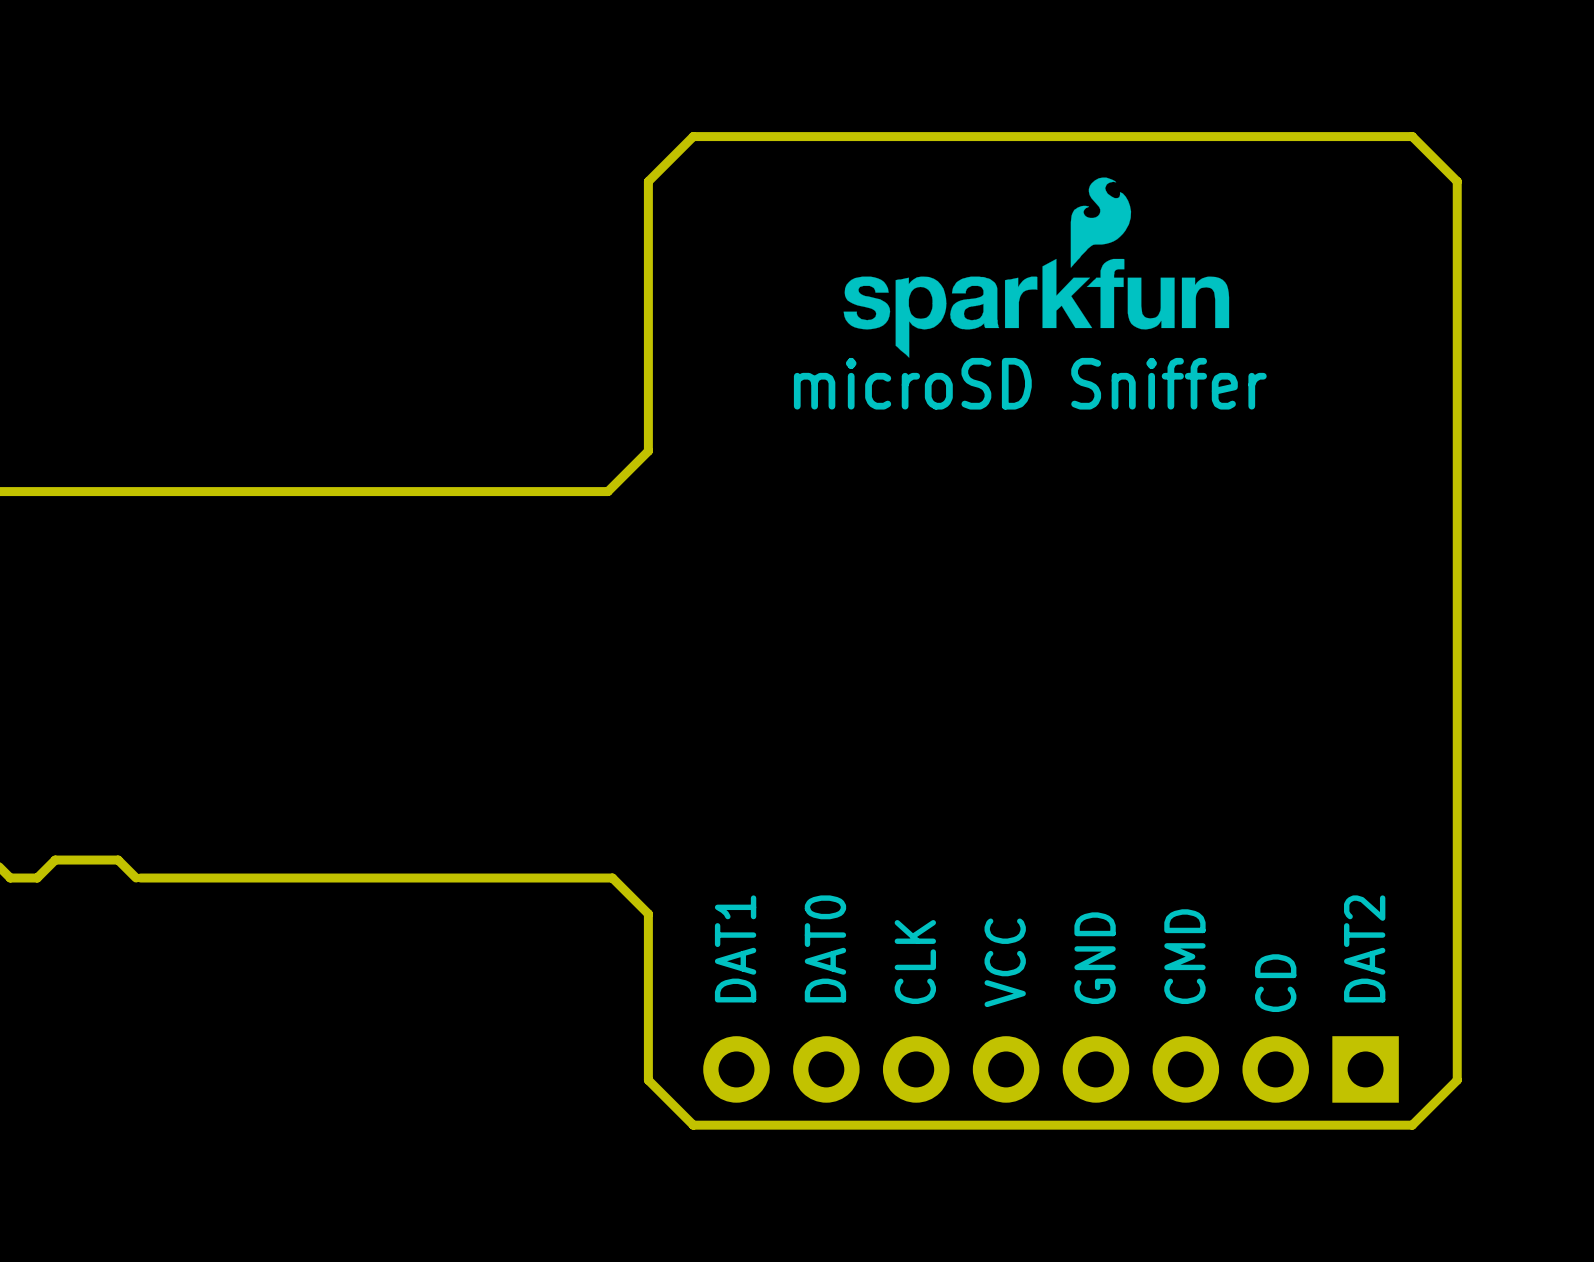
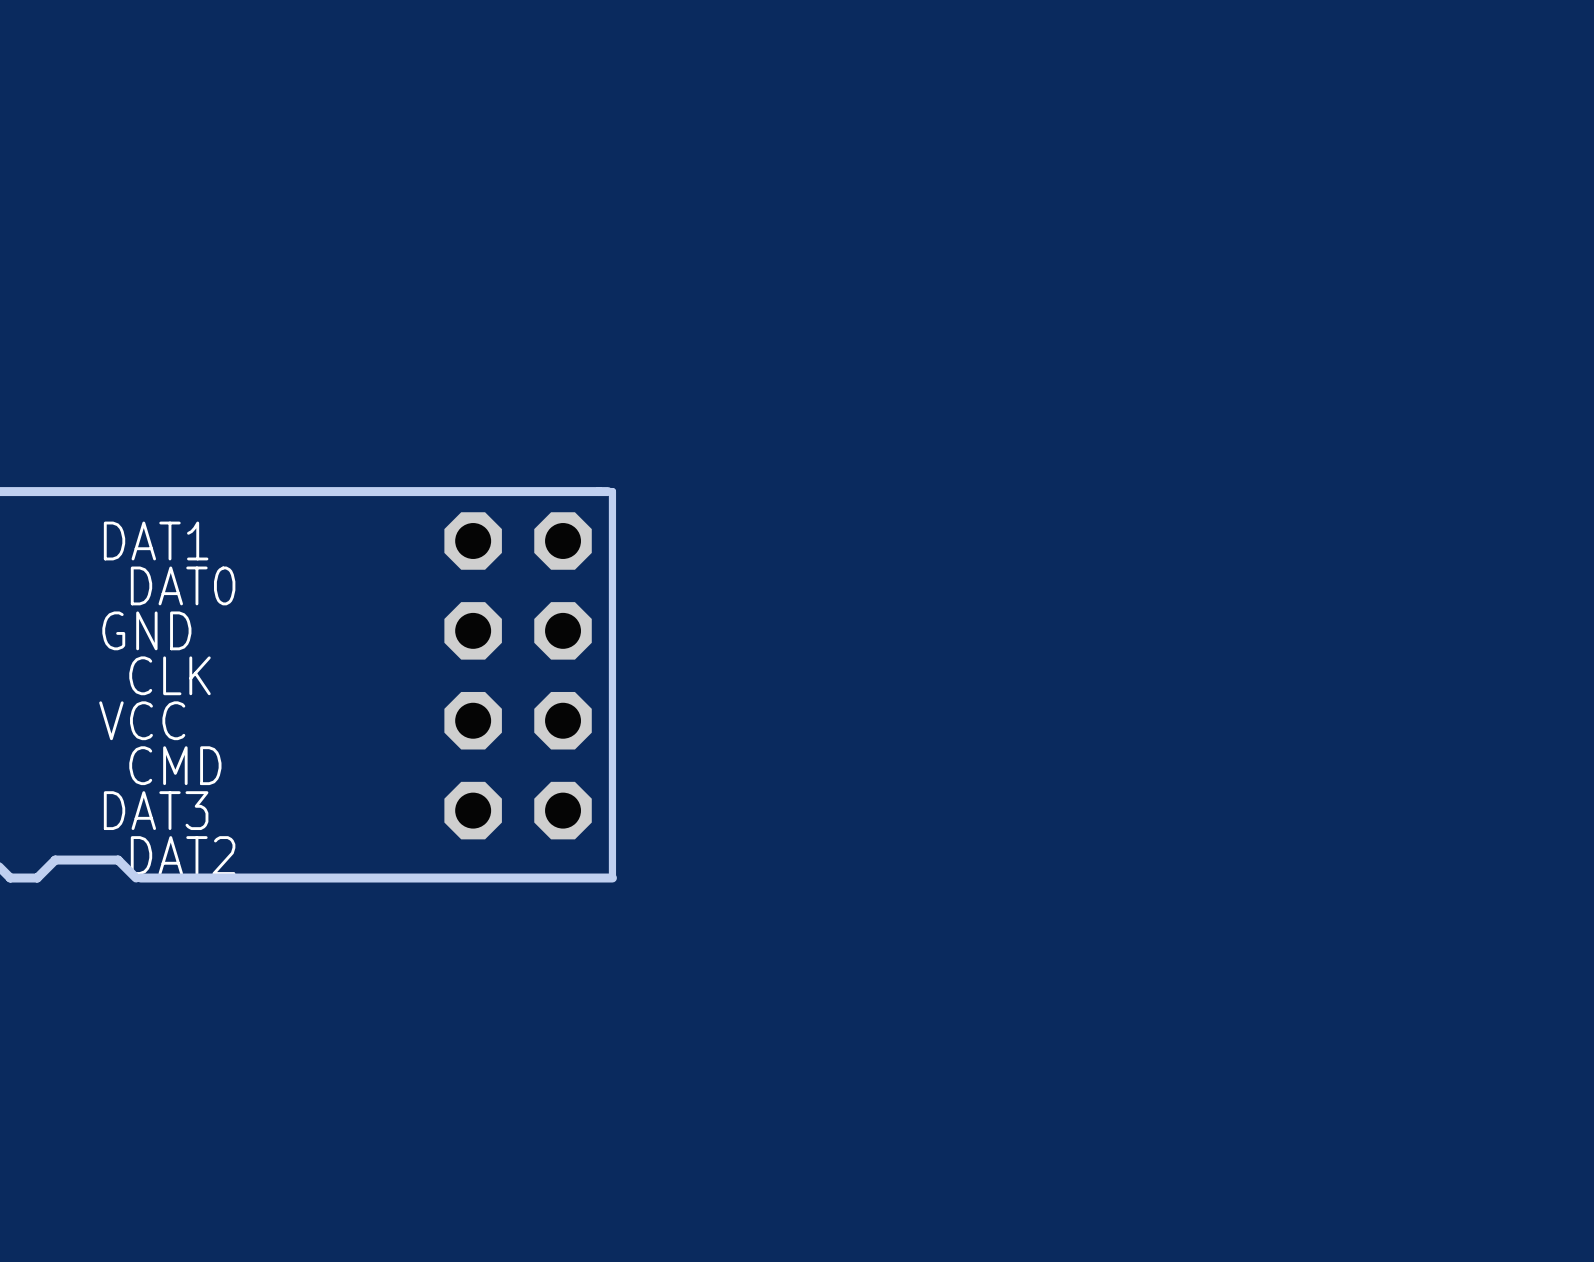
drawing: [843, 177, 1230, 358] -> none
text: microSD Sniffer (1030, 383) -> none
board edge: (607, 491) (648, 451) (648, 181) (693, 136) (1412, 136) (1457, 181) (1457, 1080) (1412, 1125) (693, 1125) (648, 1080) (648, 913) (612, 878) -> (598, 491) (612, 491) (612, 878)
text: none -> GND (146, 630)
part: none -> (518, 675)
text: none -> VCC (142, 720)
text: none -> CMD (175, 765)
text: none -> DAT3 (156, 810)
text: none -> DAT2 (183, 855)
text rotation: 0° (735, 948) -> 90° clockwise (156, 540)
text position: DAT1 (735, 948) -> DAT1 (156, 540)
text rotation: 0° (825, 948) -> 90° clockwise (183, 585)
text position: DAT0 (825, 948) -> DAT0 (183, 585)
text: DAT2 (1364, 948) -> none
text: CMD (1184, 956) -> none
text: GND (1095, 958) -> none
text rotation: 0° (915, 962) -> 90° clockwise (169, 675)
text position: CLK (915, 962) -> CLK (169, 675)
text: VCC (1005, 962) -> none
text: CD (1275, 983) -> none
part: (1051, 1069) -> none

